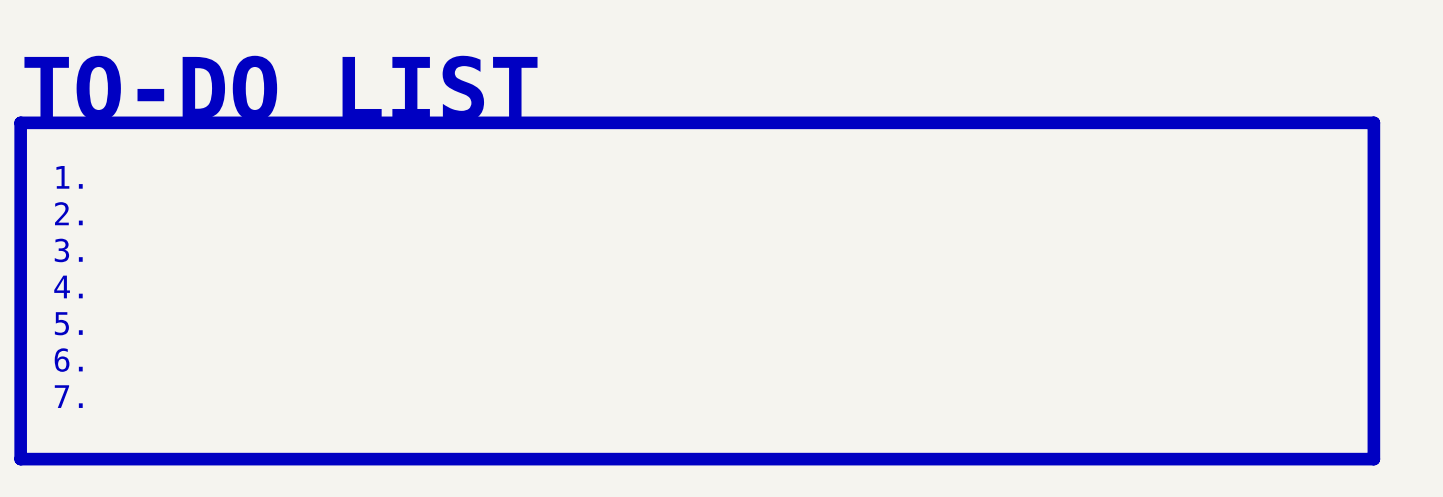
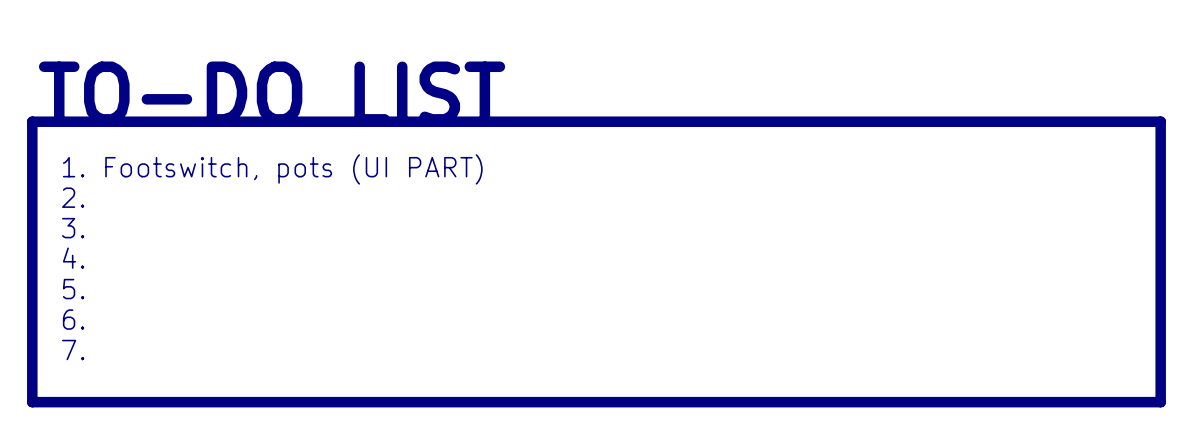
text: 1. (69, 177) -> 1. Footswitch, pots (UI PART) (272, 169)

